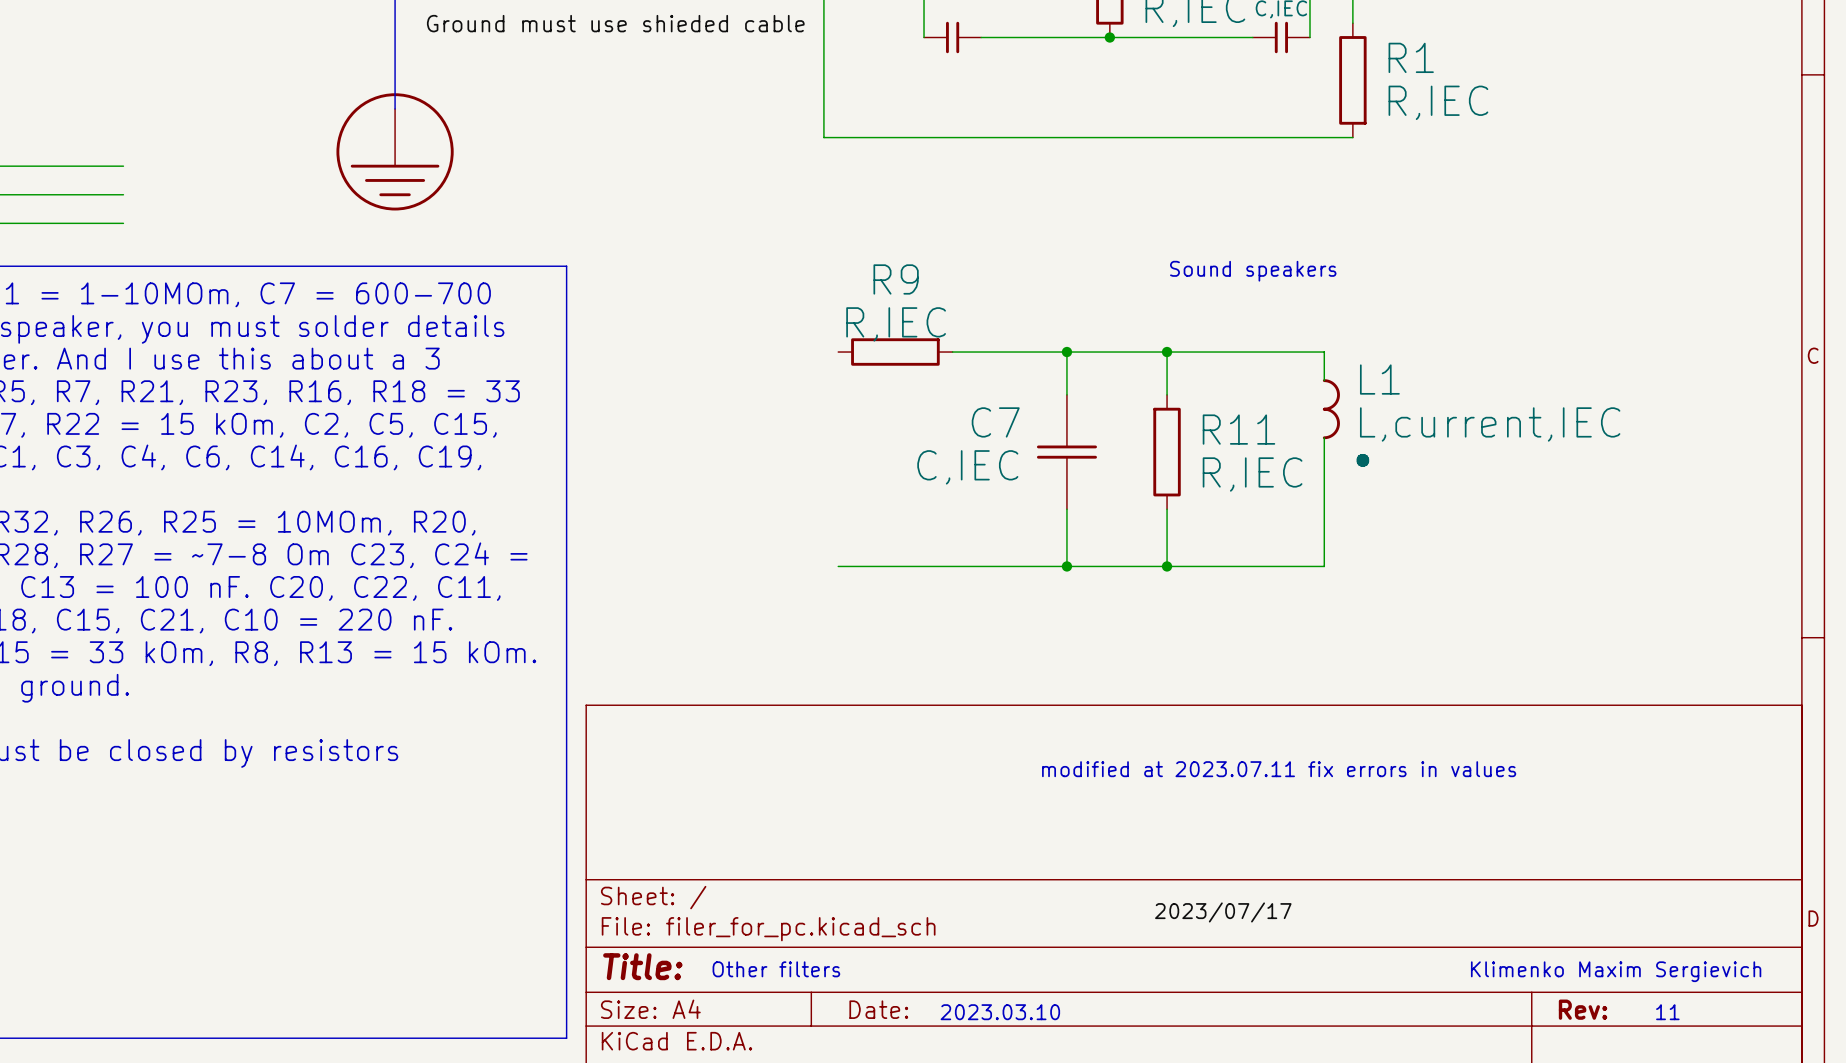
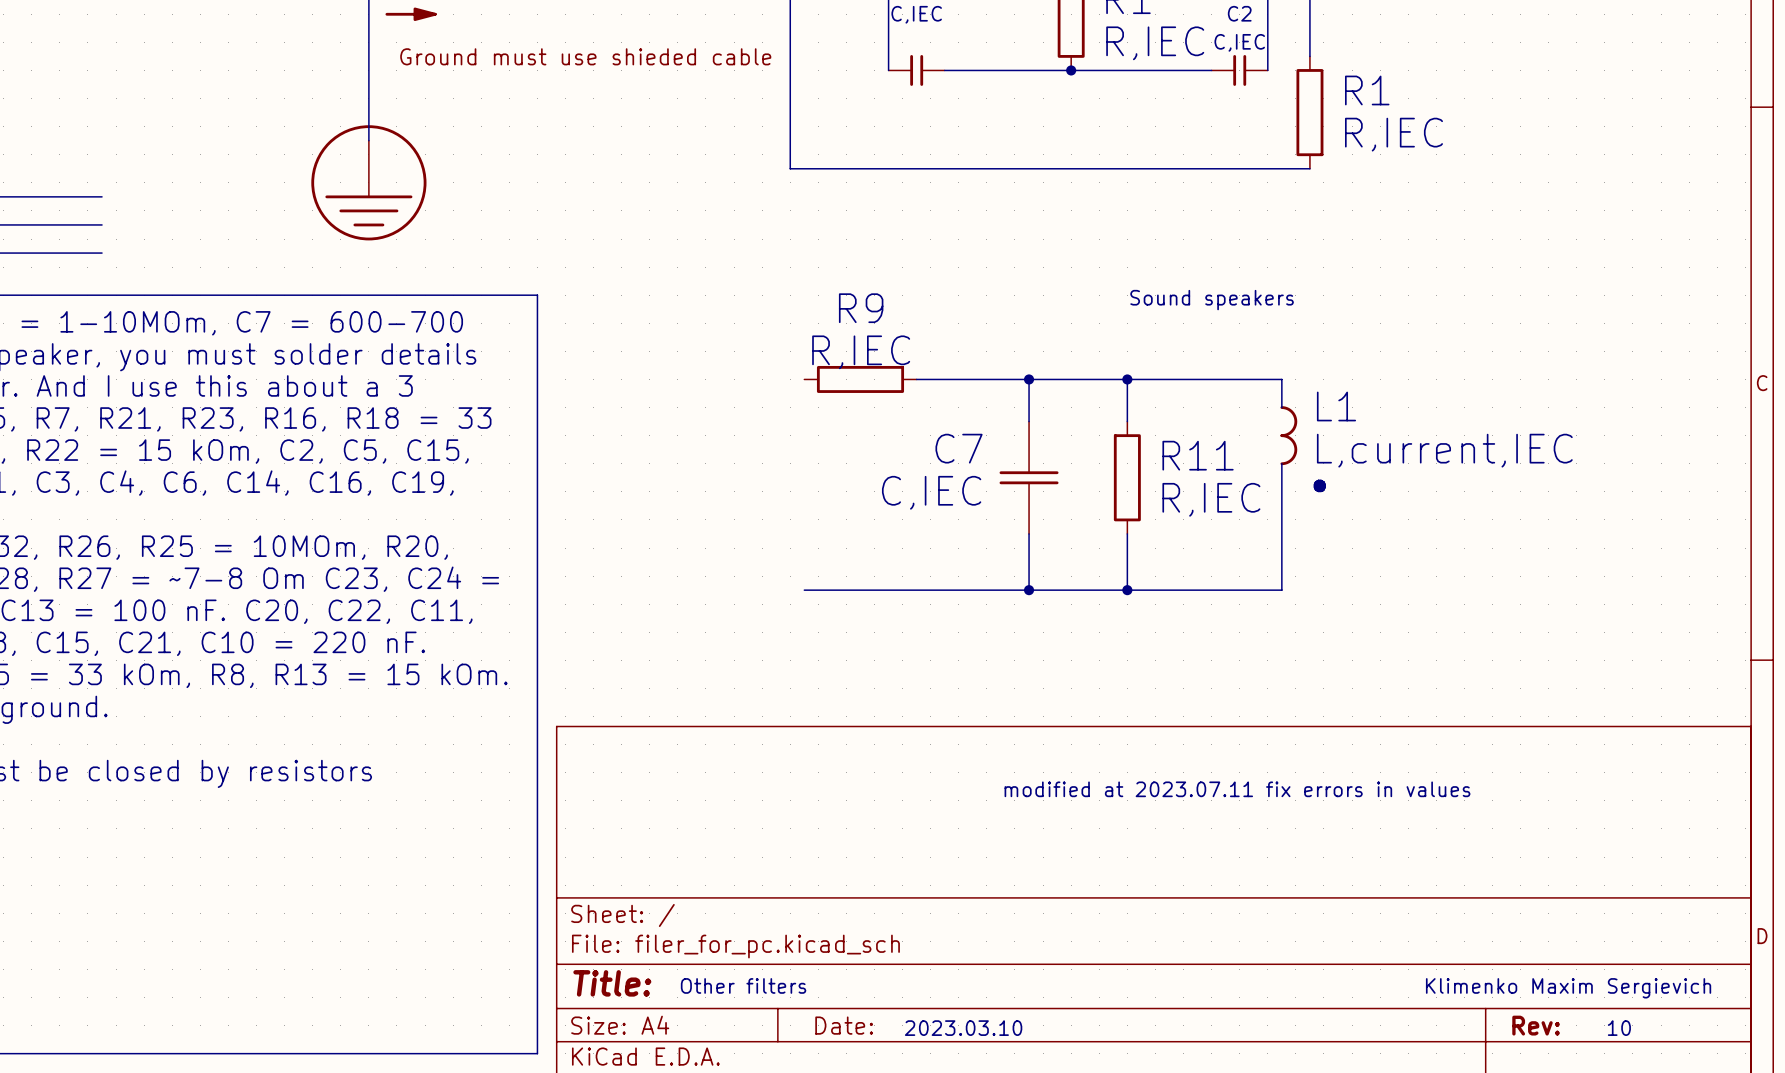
label: 2023/07/17 (1223, 912) -> none
text: 11 (1667, 1012) -> 10 (1619, 1028)

